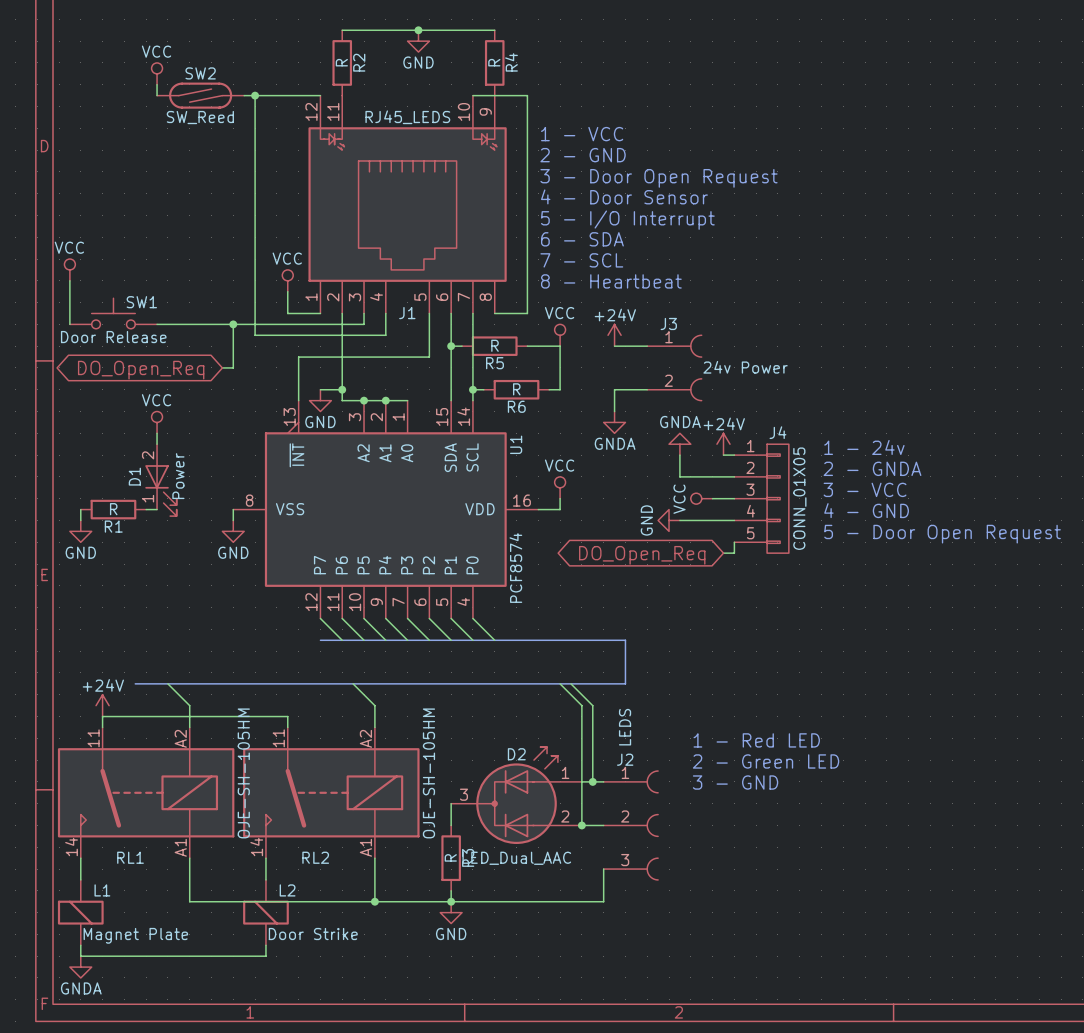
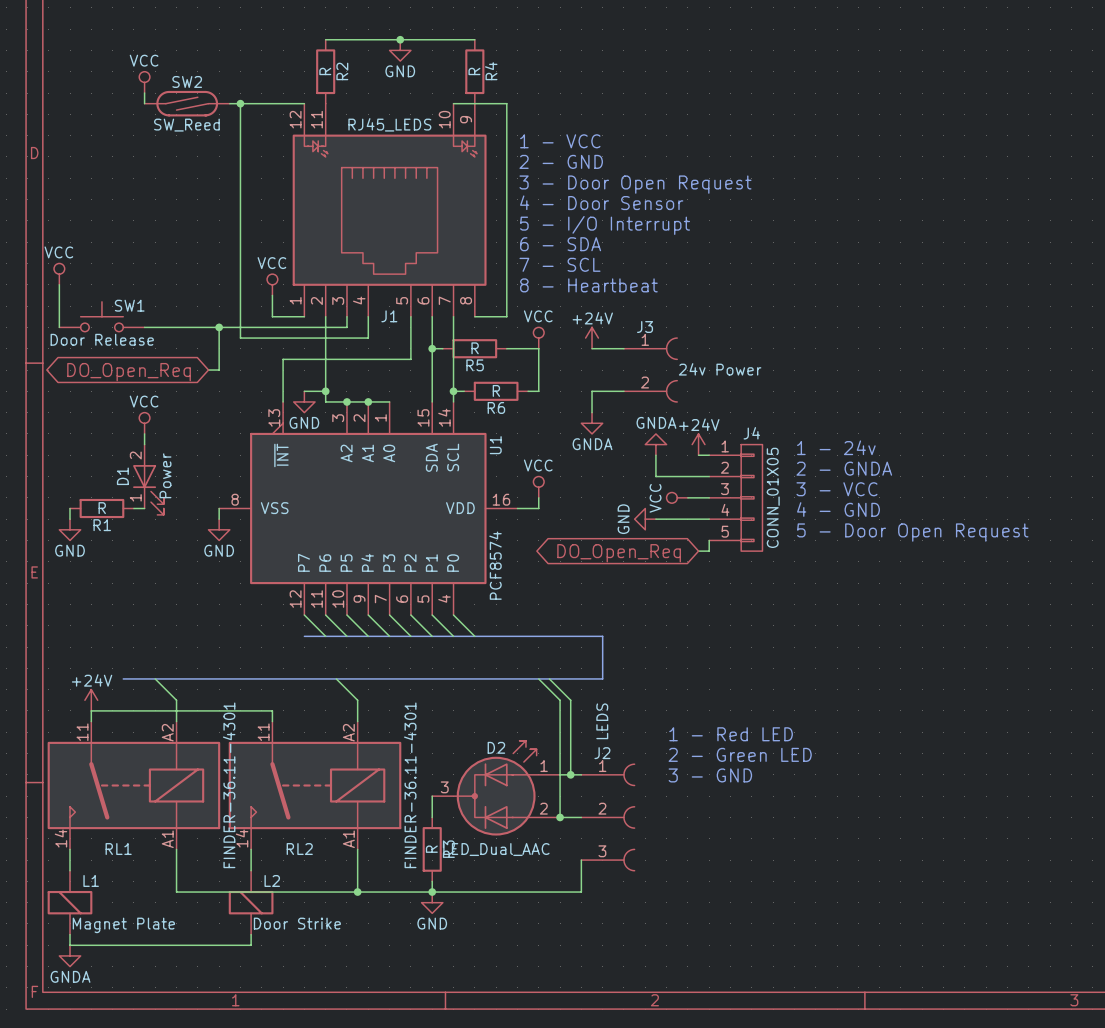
RL1 value: OJE-SH-105HM (243, 773) -> FINDER-36.11-4301 (229, 785)
RL2 value: OJE-SH-105HM (428, 773) -> FINDER-36.11-4301 (410, 785)

